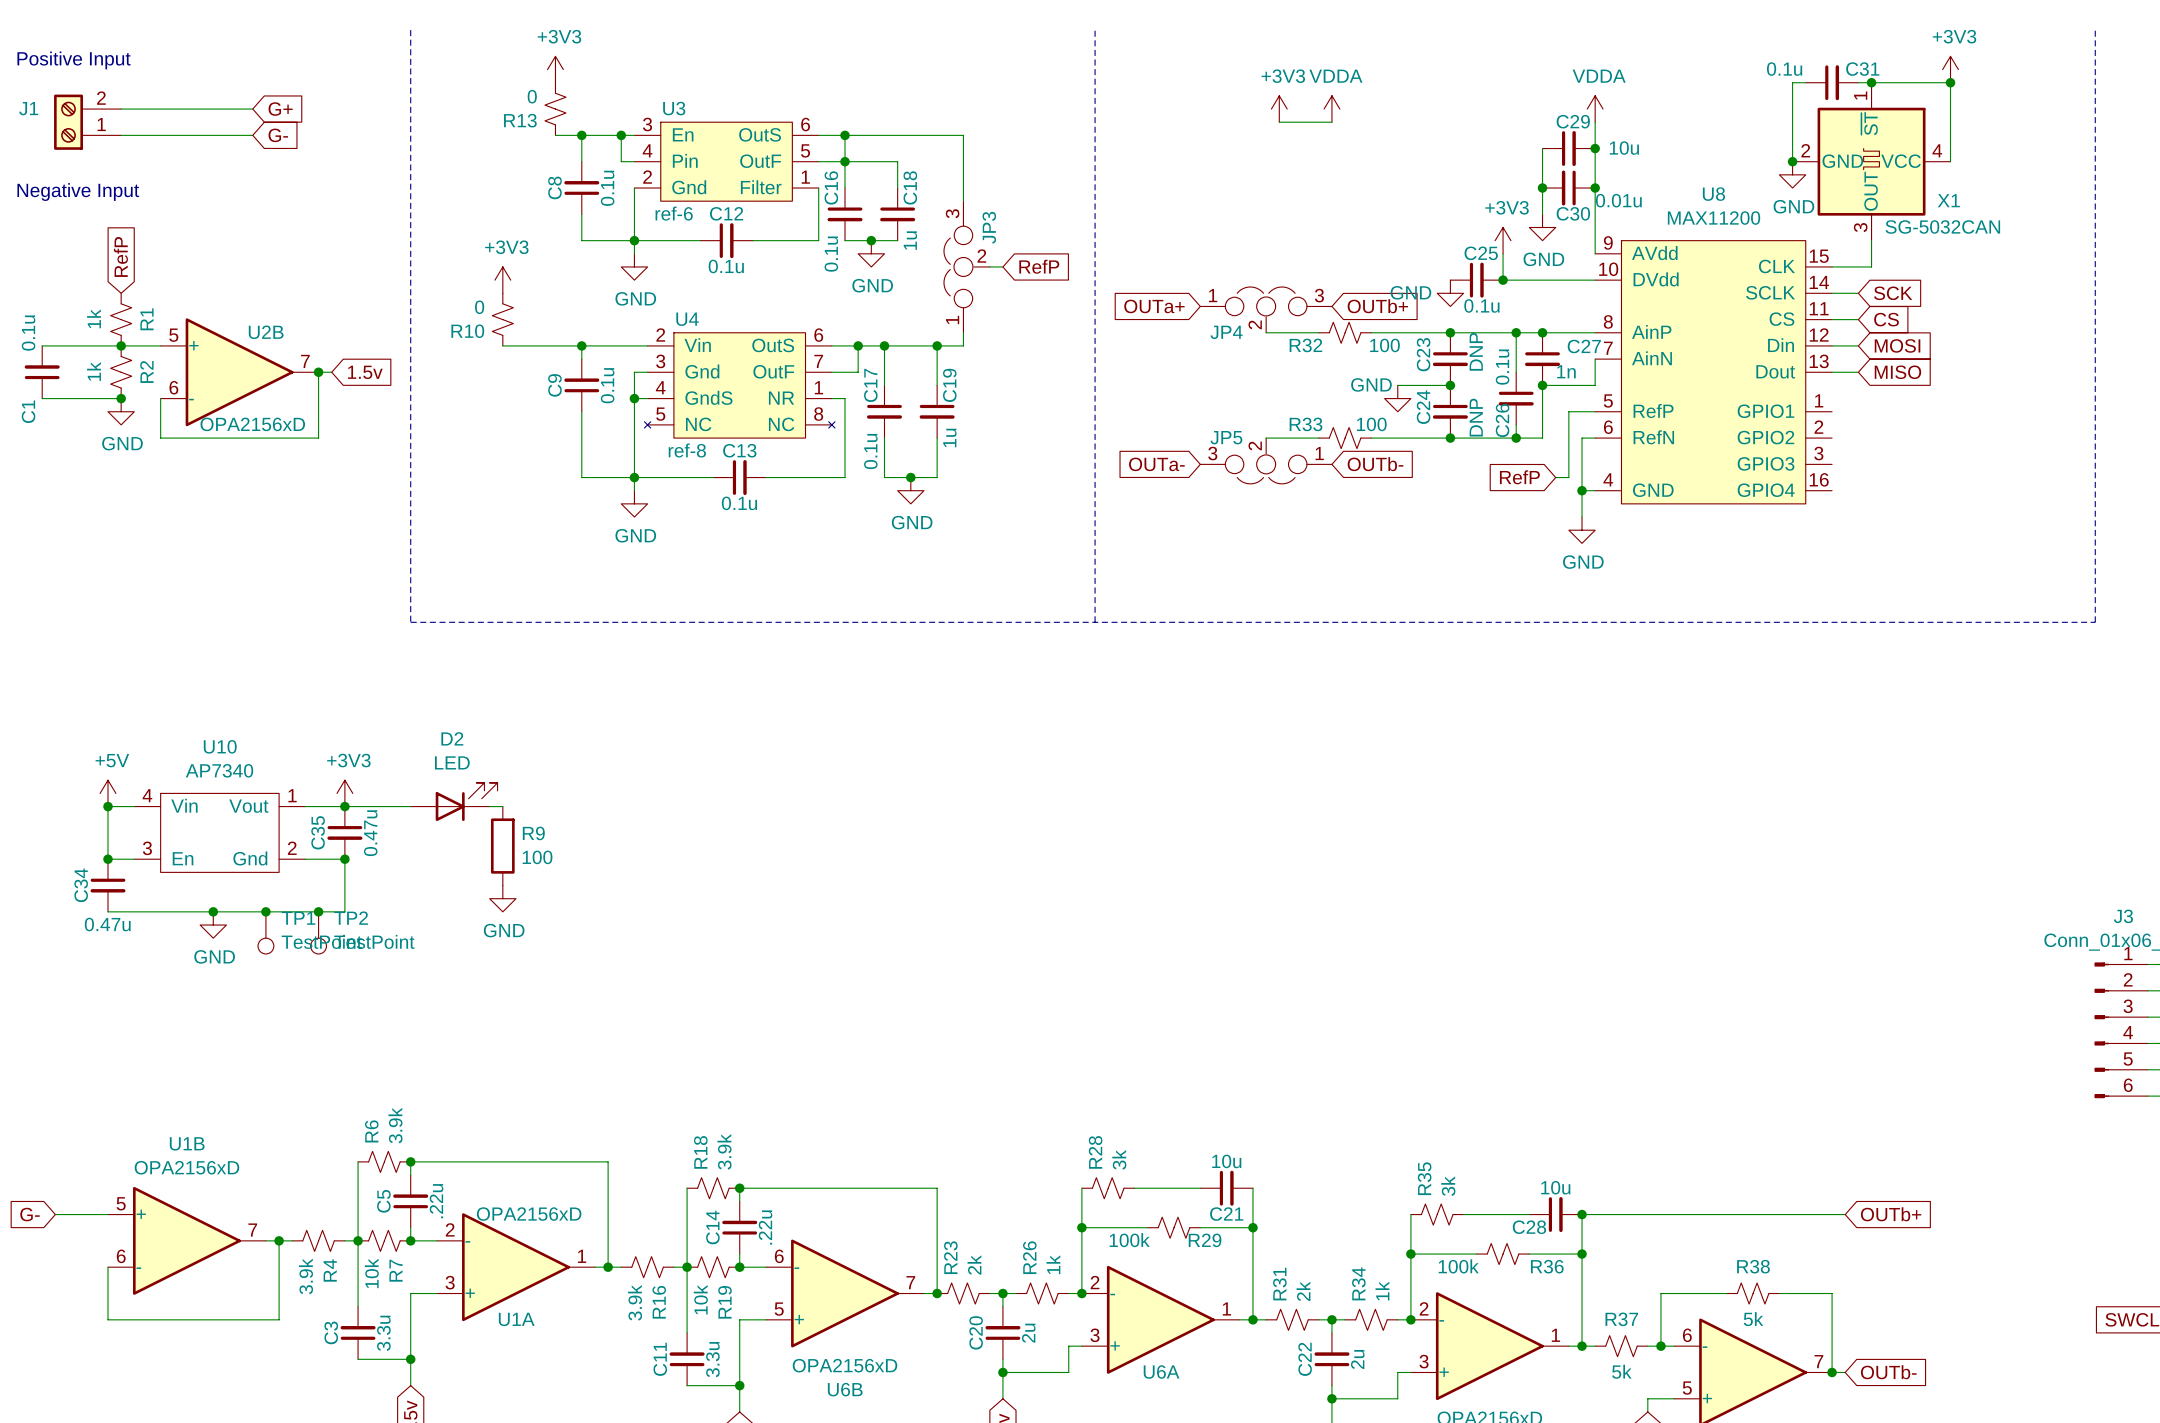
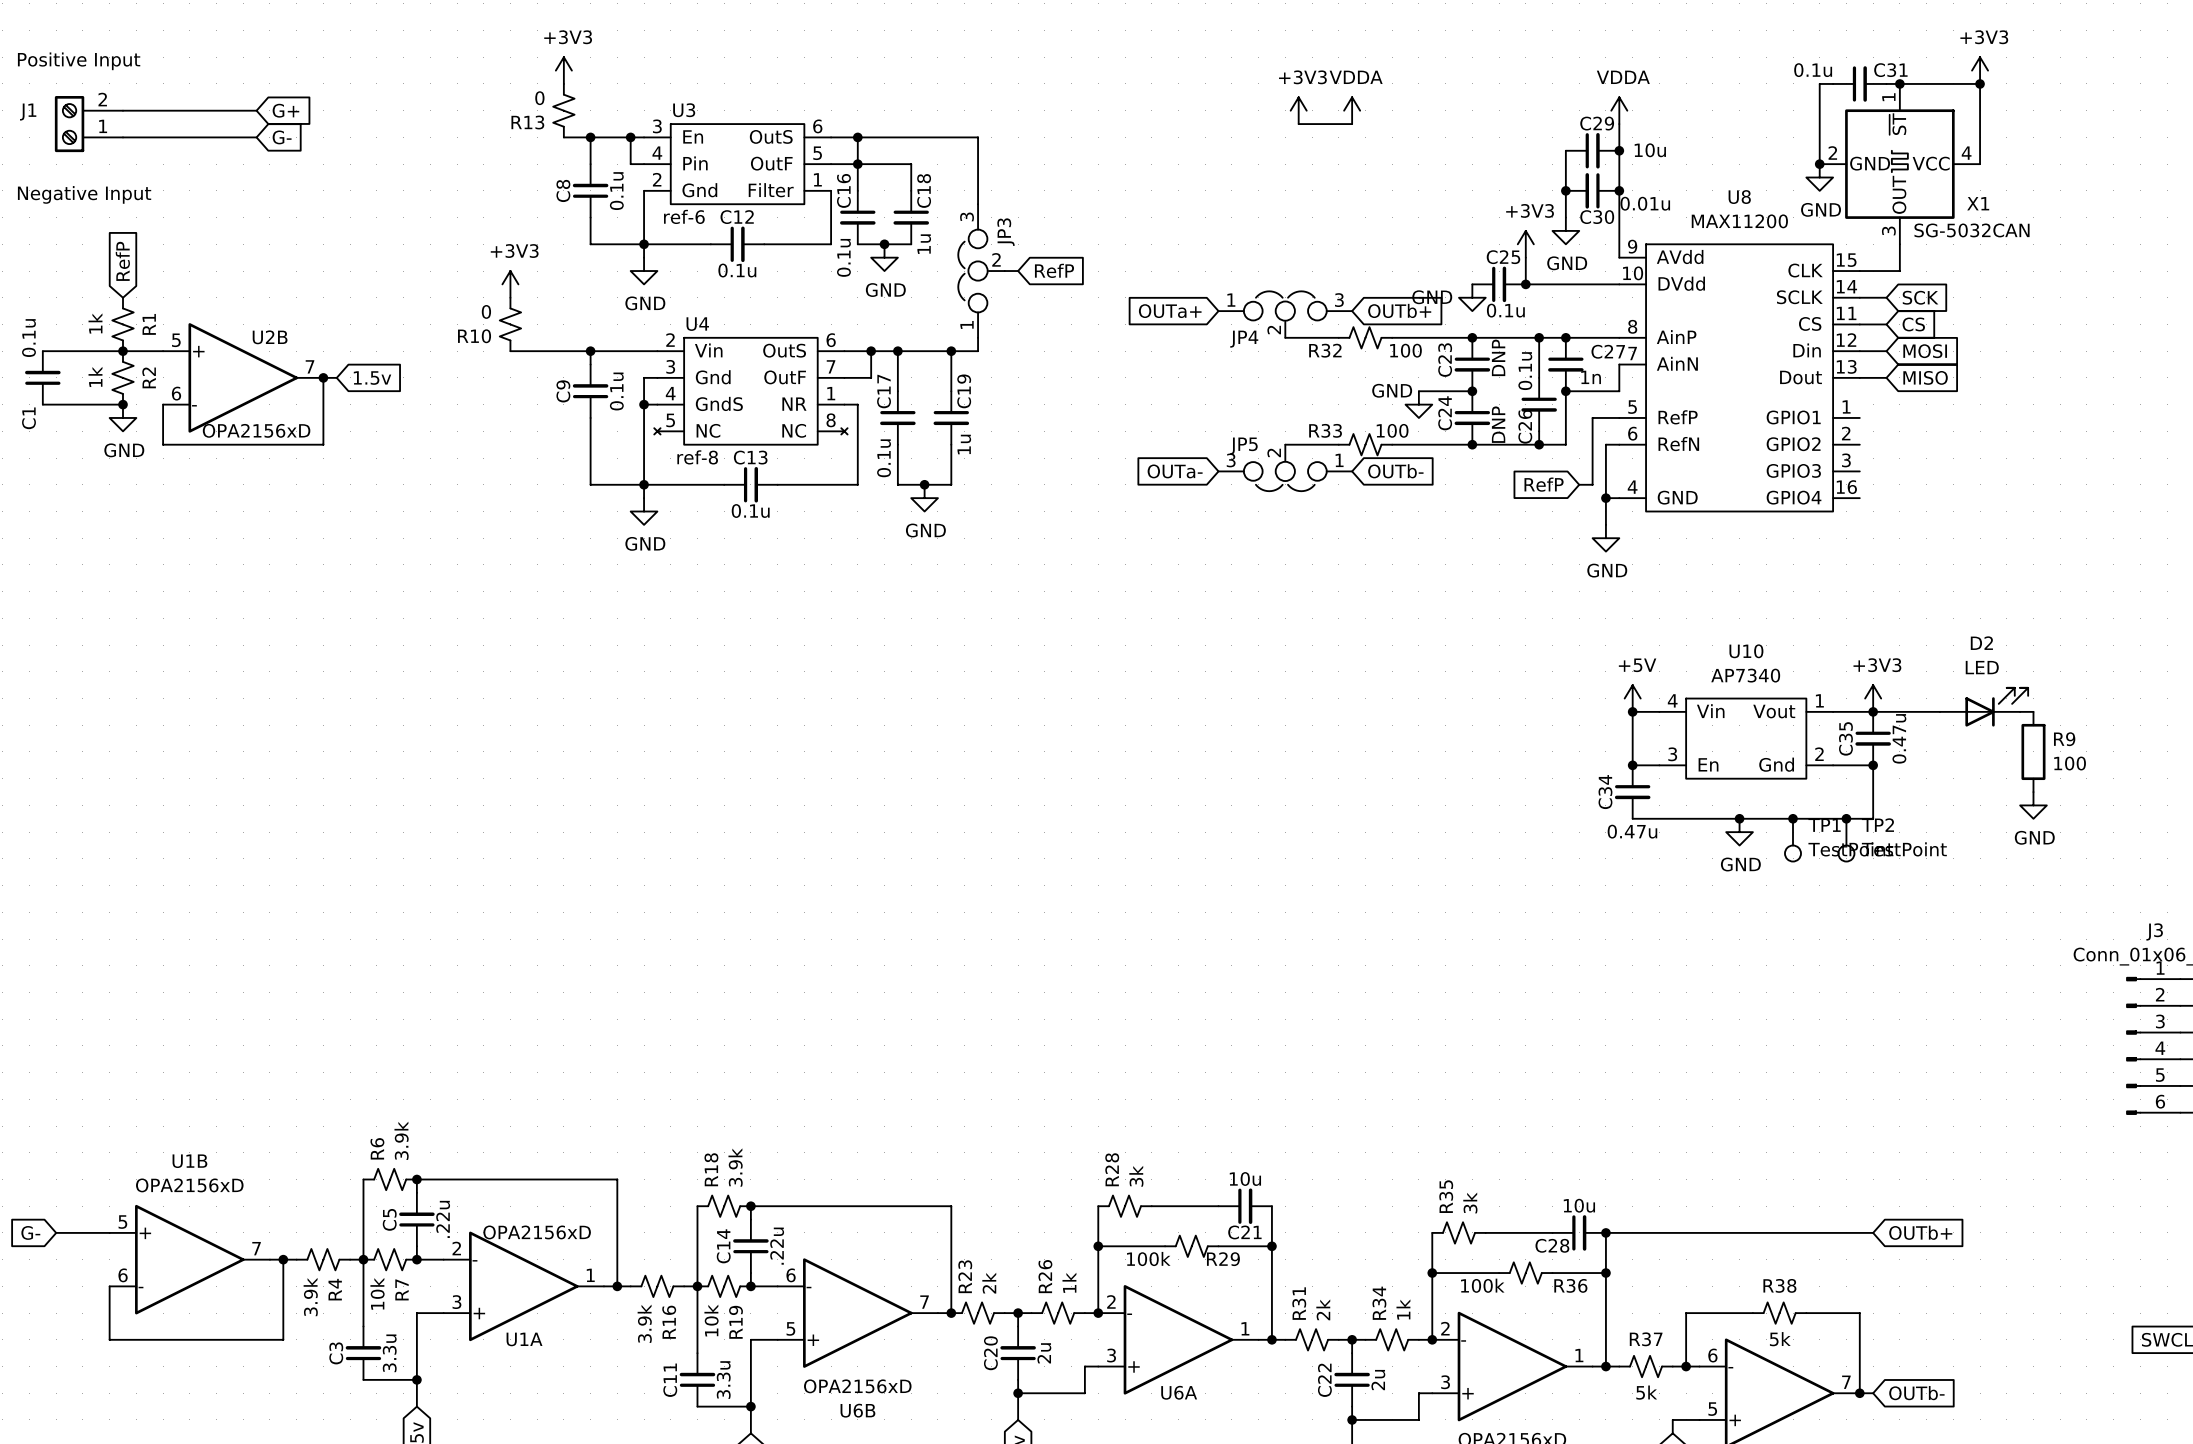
line: (410, 30) (410, 622) (2095, 622) (2095, 30) -> none
line: (1095, 30) (1095, 622) -> none
power symbol: none -> +5V (1632, 698)
power symbol: none -> +3V3 (1873, 698)
junction: none -> (1632, 711)
wire: none -> (1659, 711) (1632, 711) (1632, 765) (1659, 765)
wire: none -> (1833, 711) (1939, 711)
junction: none -> (1873, 711)
wire: none -> (2020, 711) (2033, 711)
junction: none -> (1632, 765)
wire: none -> (1833, 765) (1873, 765) (1873, 818) (1632, 818)
junction: none -> (1873, 765)
power symbol: +5V (108, 793) -> none
power symbol: +3V3 (344, 793) -> none
power symbol: none -> GND (2033, 805)
D2 position: (454, 801) -> (1984, 707)
junction: (108, 806) -> none
wire: (134, 806) (108, 806) (108, 859) (134, 859) -> none
wire: (305, 806) (410, 806) -> none
junction: (344, 806) -> none
wire: (489, 806) (502, 806) -> none
junction: none -> (1739, 818)
junction: none -> (1793, 818)
junction: none -> (1846, 818)
power symbol: none -> GND (1739, 832)
U10 position: (219, 832) -> (1746, 738)
C35 position: (344, 832) -> (1873, 738)
R9 position: (502, 846) -> (2033, 751)
junction: (108, 859) -> none
wire: (305, 859) (344, 859) (344, 911) (108, 911) -> none
junction: (344, 859) -> none
C34 position: (108, 885) -> (1632, 792)
power symbol: GND (502, 898) -> none
junction: (213, 911) -> none
junction: (265, 911) -> none
junction: (318, 911) -> none
power symbol: GND (213, 925) -> none
TP1 position: (265, 932) -> (1793, 840)
TP2 position: (318, 932) -> (1846, 840)

